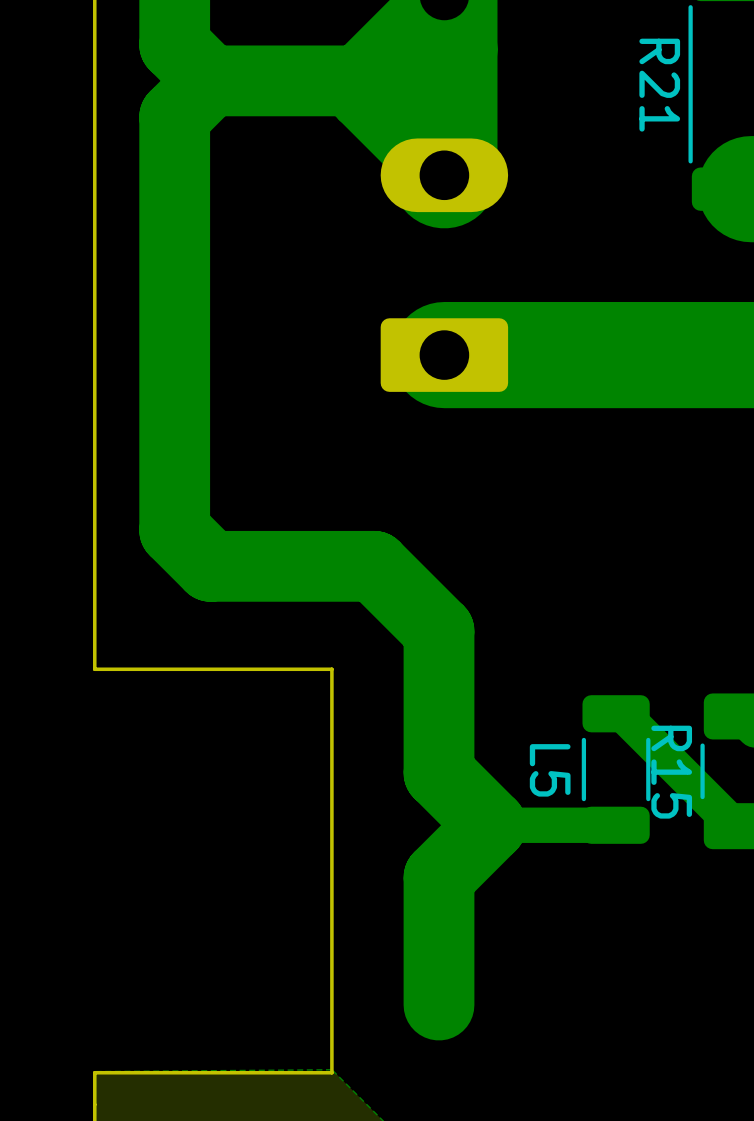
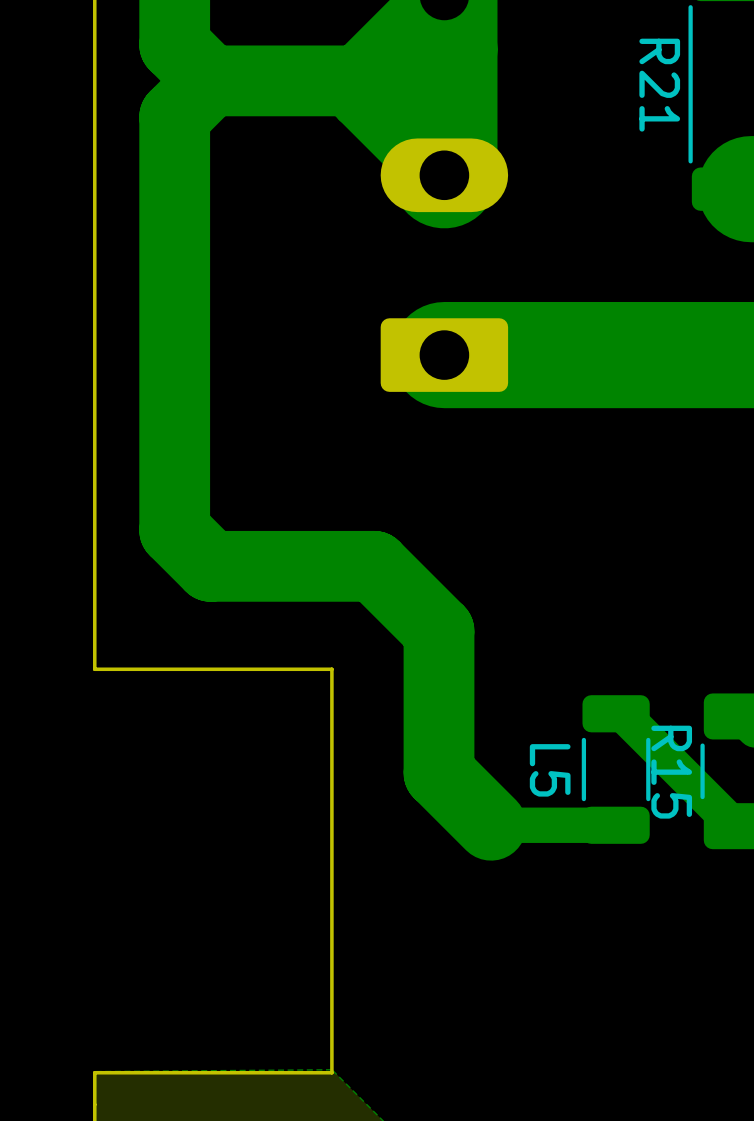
bottom track: (491, 825) (439, 877) (439, 1005) -> none

